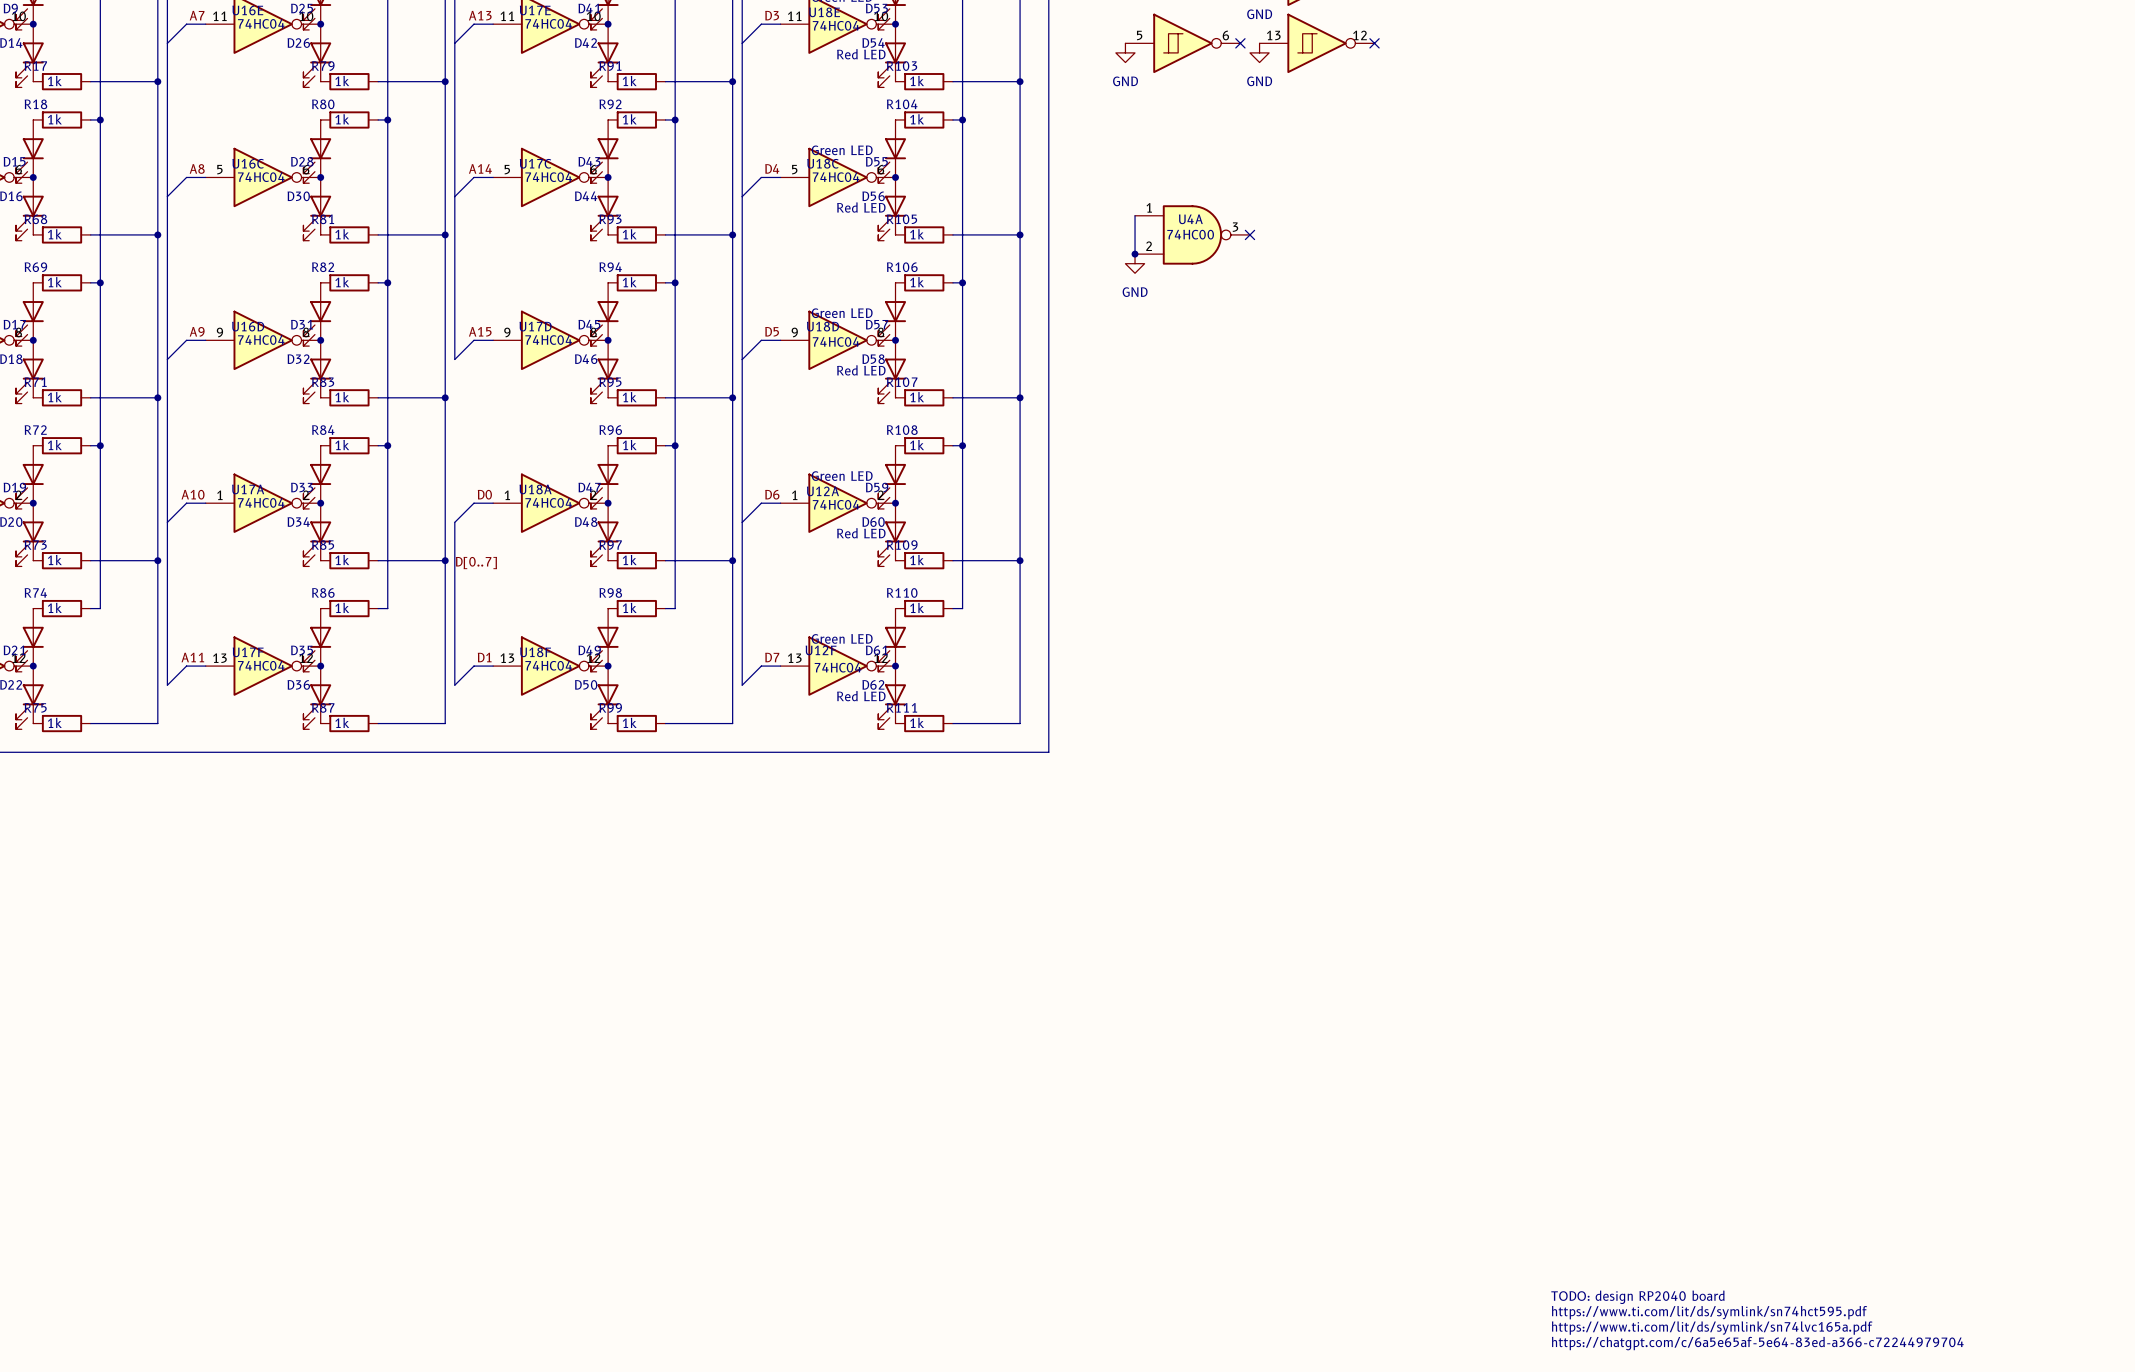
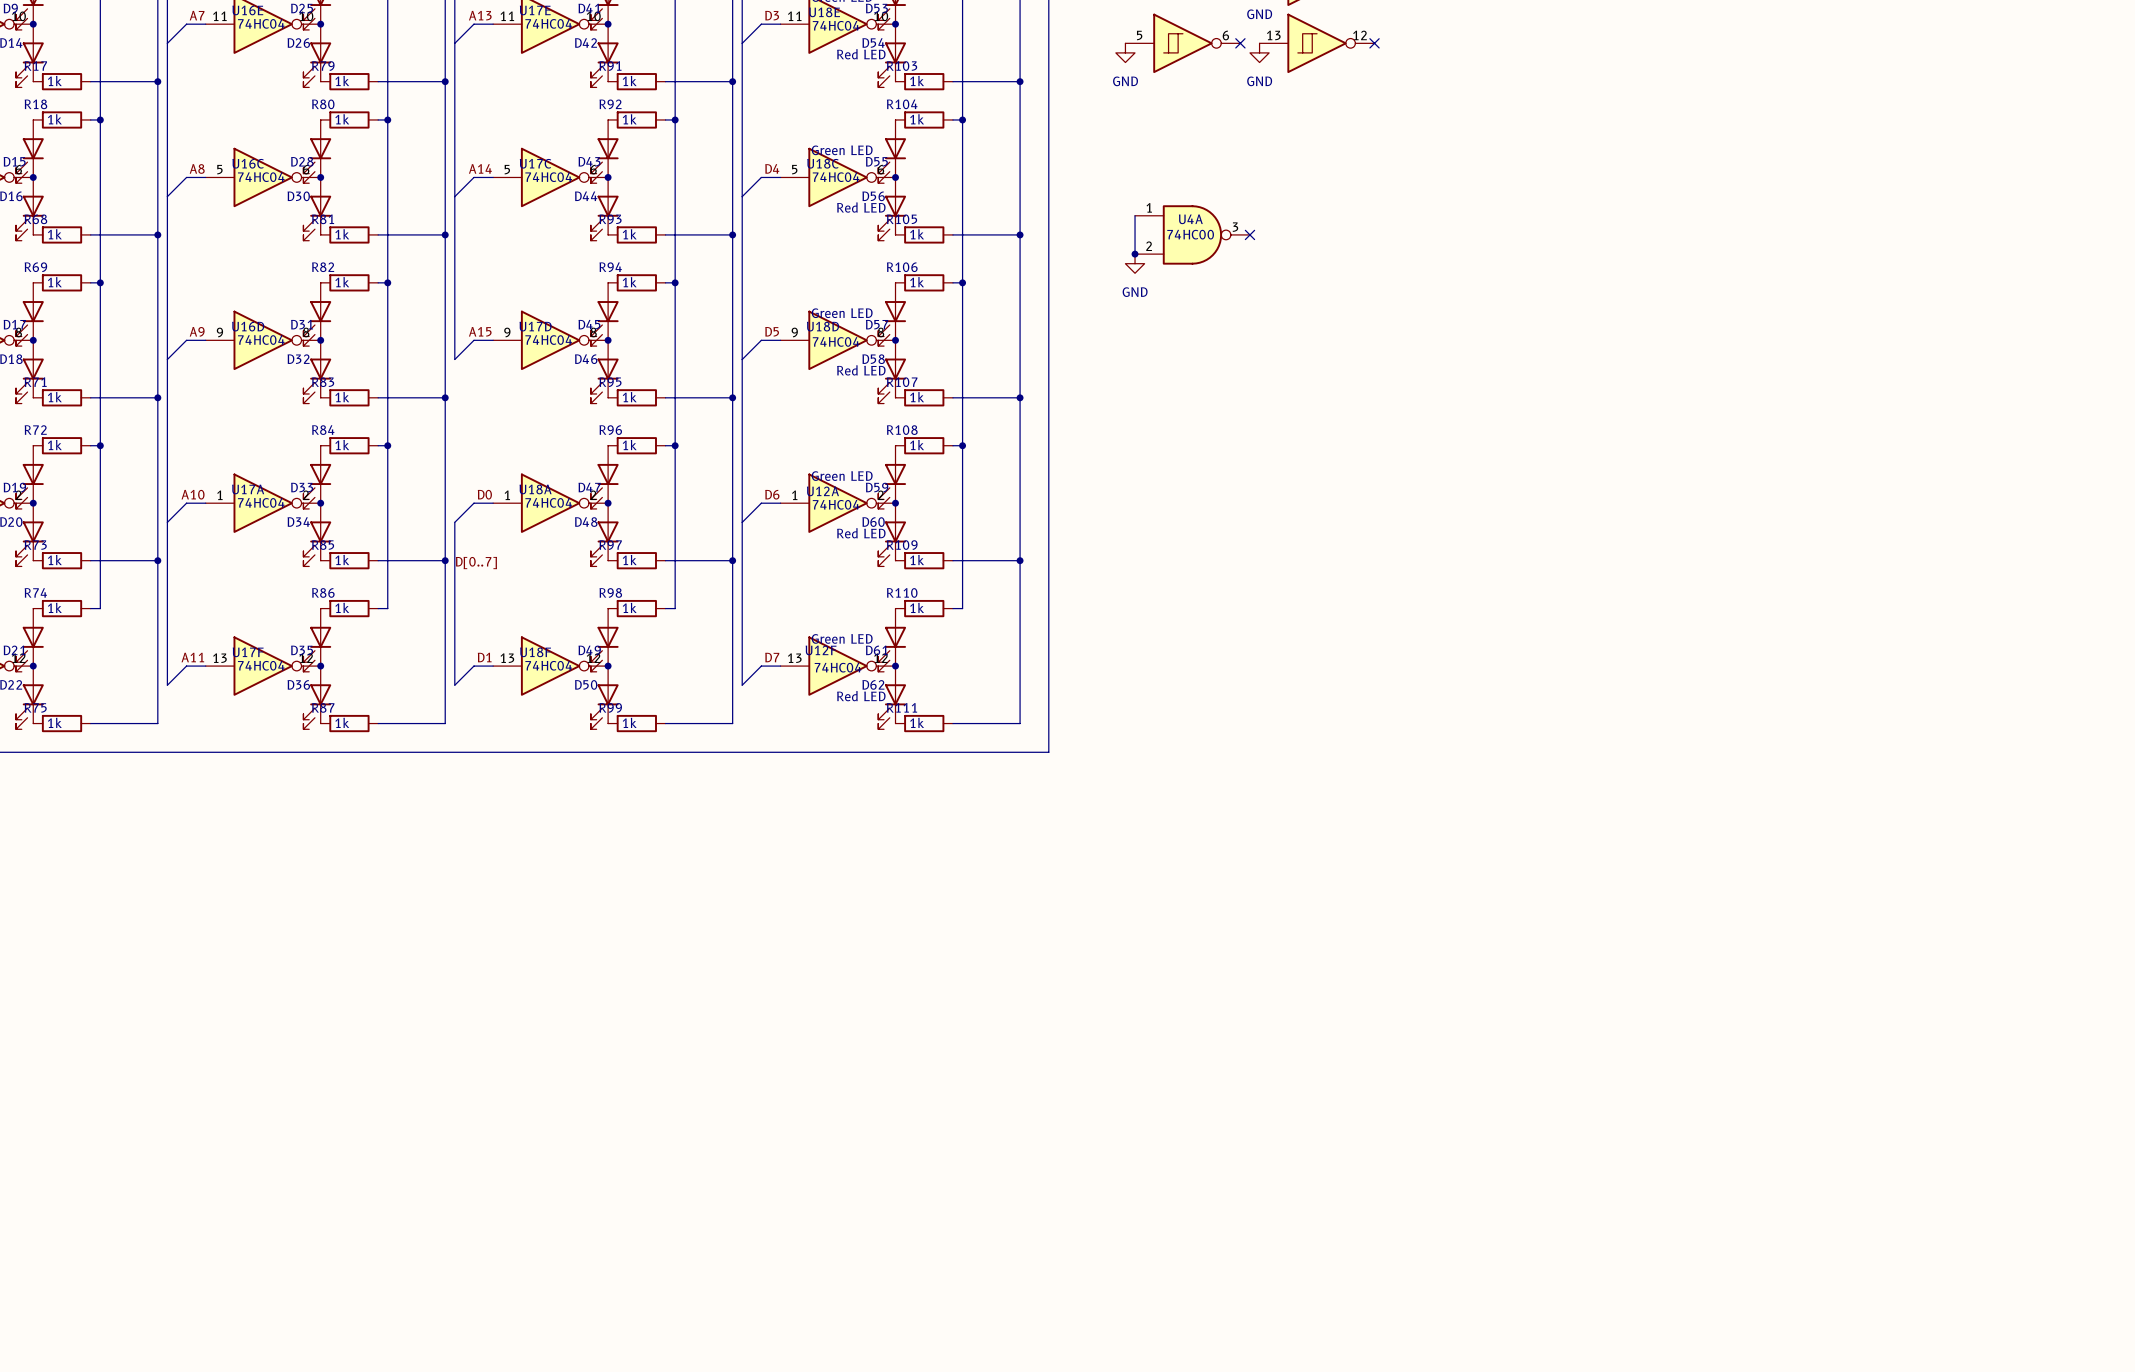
text: TODO: design RP2040 board (1637, 1297) -> none
text: https://www.ti.com/lit/ds/symlink/sn74hct595.pdf (1709, 1312) -> none
text: https://www.ti.com/lit/ds/symlink/sn74lvc165a.pdf (1712, 1328) -> none
text: https://chatgpt.com/c/6a5e65af-5e64-83ed-a366-c72244979704 (1757, 1343) -> none

